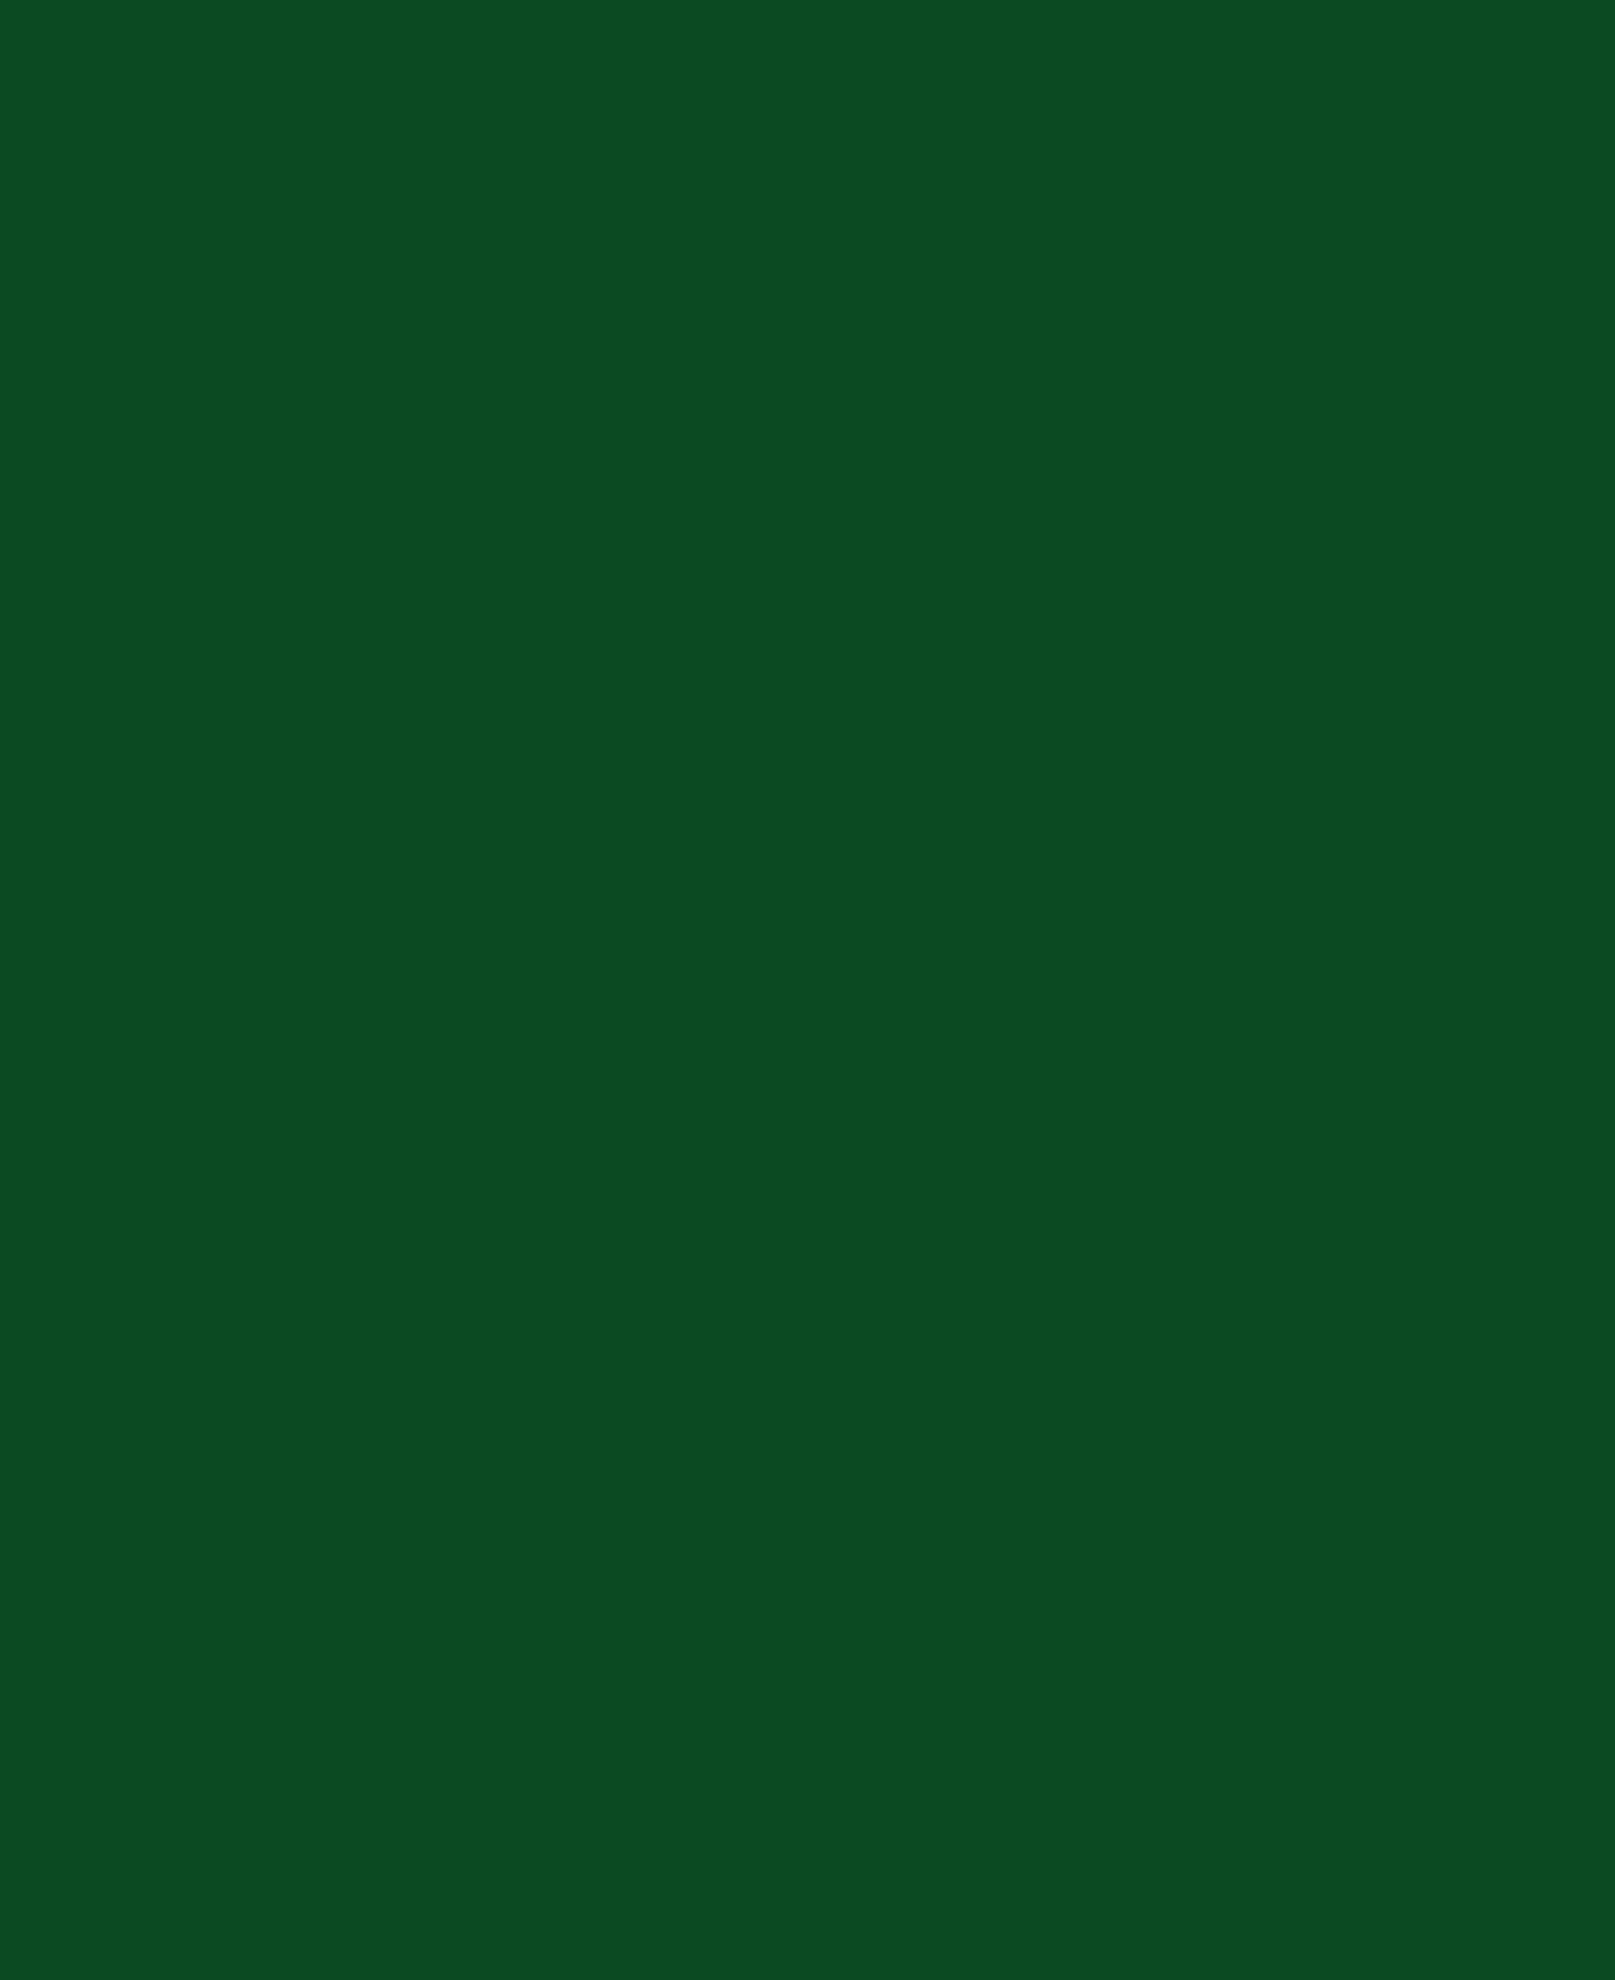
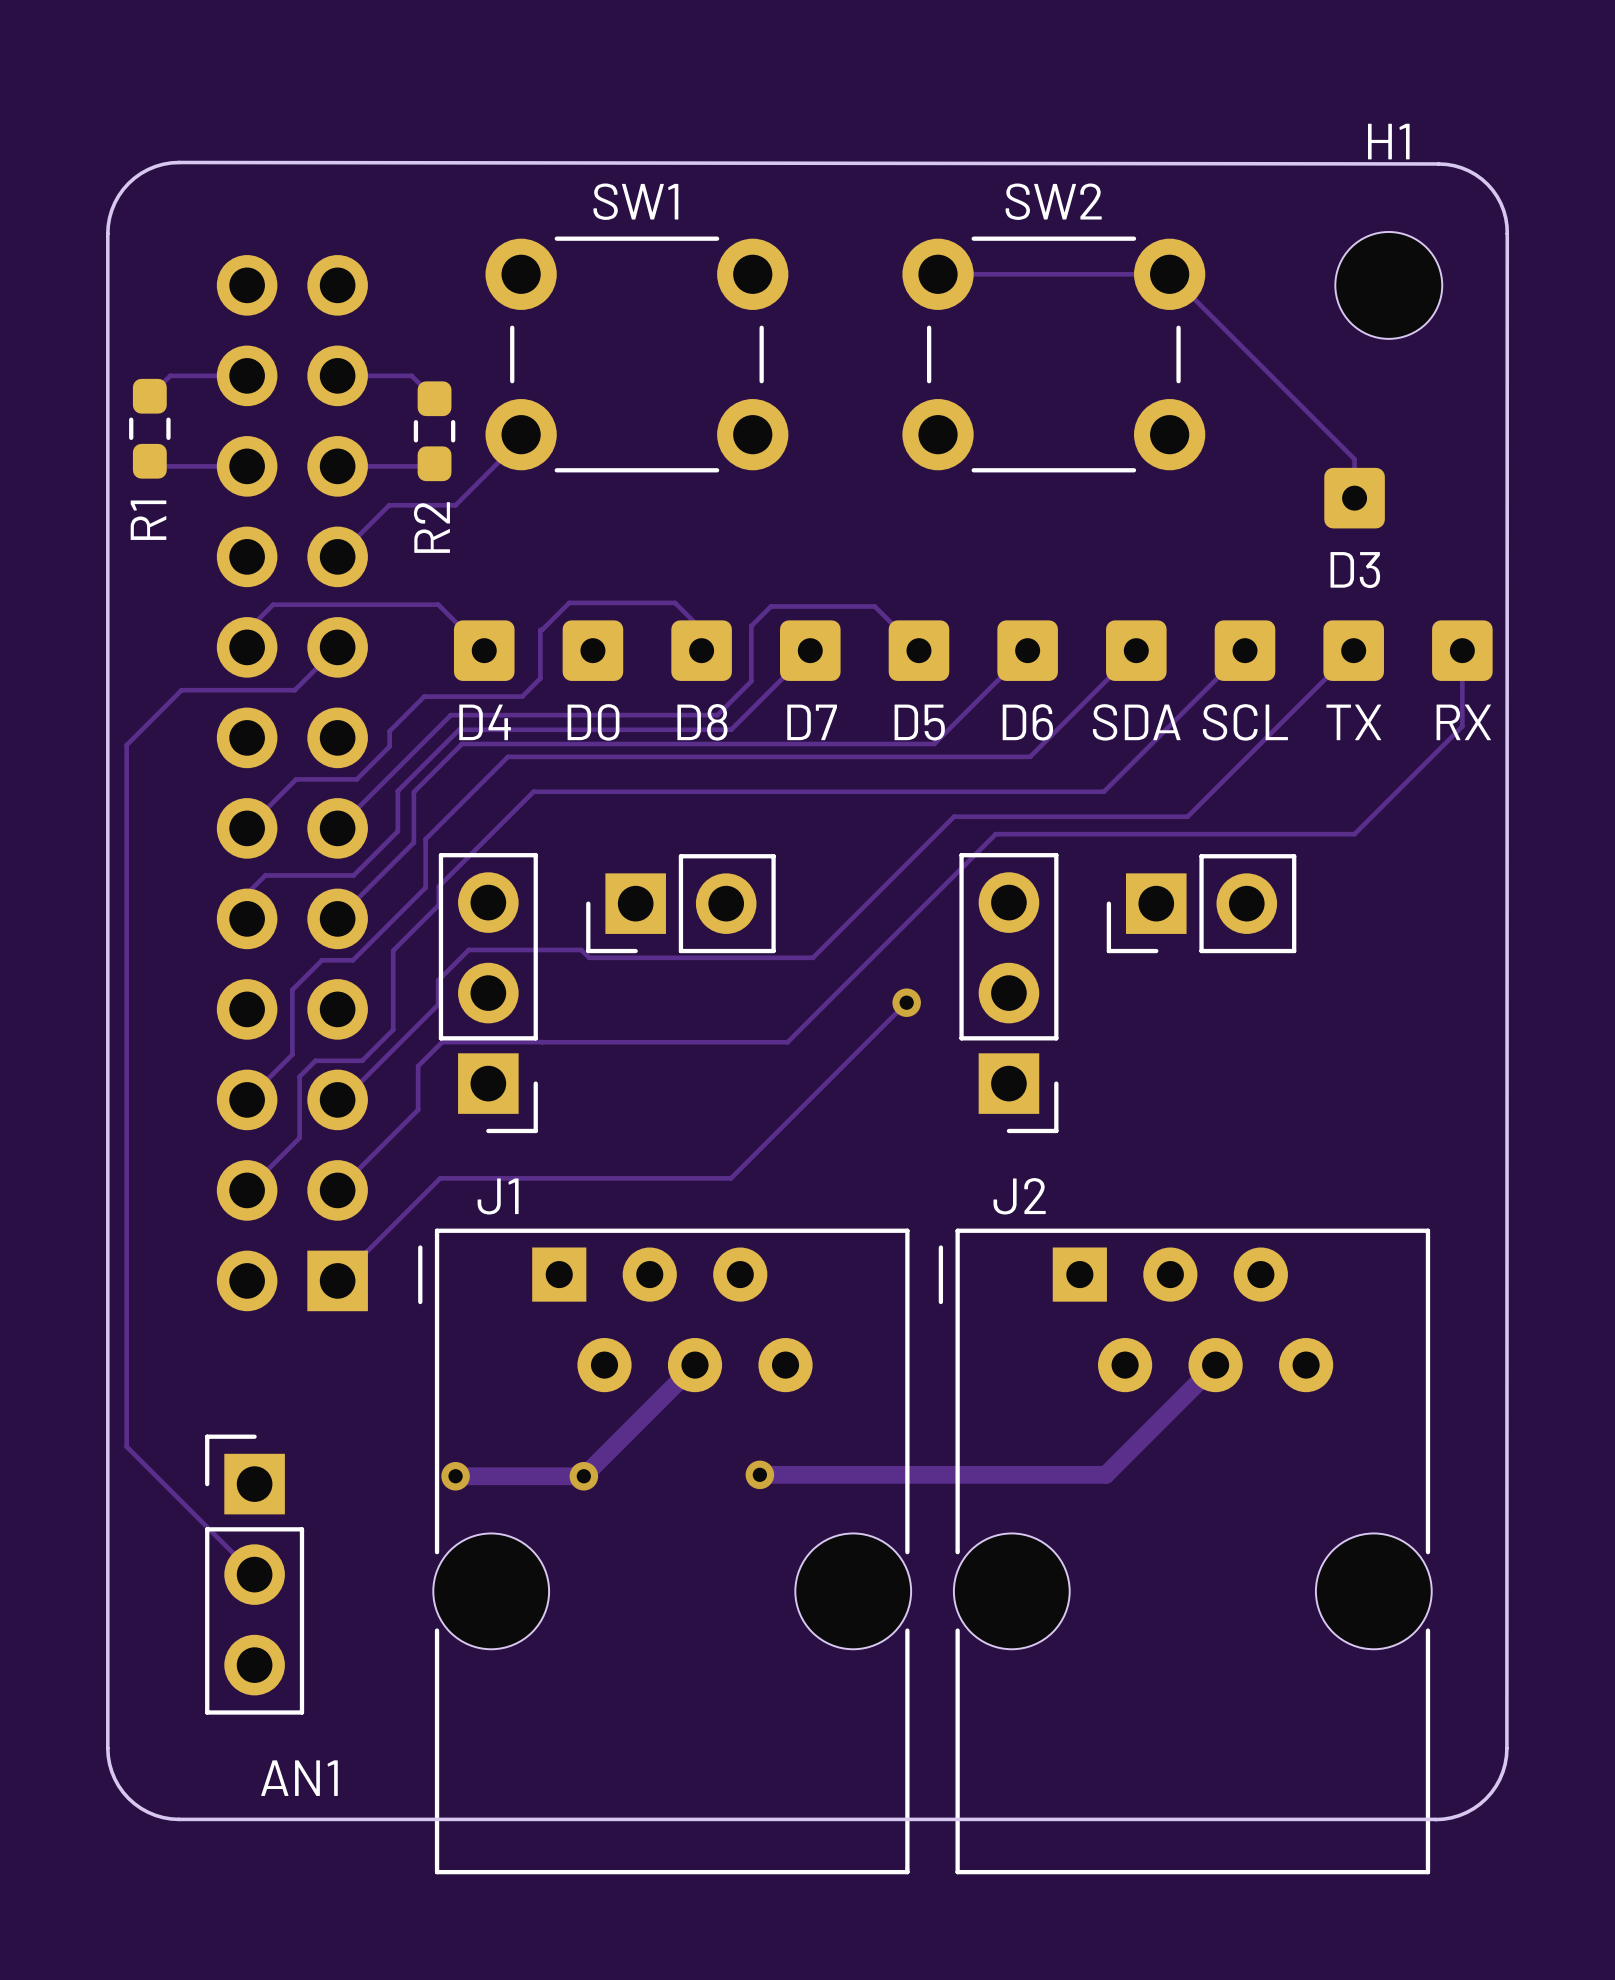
board edge: none -> (1507, 233) (1503, 210) (1497, 196) (1487, 184) (1468, 170) (1454, 165) (1438, 163) (179, 162) (163, 164) (148, 169) (128, 183) (114, 202) (109, 217) (107, 233) (107, 1748) (111, 1771) (123, 1792) (134, 1803) (148, 1812) (163, 1817) (179, 1819) (1435, 1819)
board edge: none -> (1507, 233) (1506, 1748)
track: none -> (938, 274) (1169, 274) (1354, 459) (1354, 498)
H1: none -> (1388, 285)
SW1: none -> (636, 354)
SW2: none -> (1053, 354)
track: none -> (247, 375) (170, 375) (149, 396)
track: none -> (337, 375) (411, 375) (434, 398)
R1: none -> (149, 428)
R2: none -> (434, 431)
track: none -> (521, 434) (521, 439) (455, 505) (389, 505) (337, 556)
track: none -> (149, 461) (154, 466) (247, 466)
track: none -> (434, 463) (431, 466) (337, 466)
part: none -> D3 (1354, 498)
track: none -> (247, 647) (247, 630) (273, 604) (438, 604) (484, 650)
track: none -> (337, 647) (294, 690) (181, 690) (126, 745) (126, 1446) (254, 1574)
part: none -> D4 (484, 650)
part: none -> D0 (592, 650)
track: none -> (701, 650) (701, 629) (675, 602) (569, 602) (540, 629) (540, 678) (522, 696) (424, 696) (389, 731) (389, 746) (356, 779) (296, 779) (247, 828)
part: none -> D8 (701, 650)
track: none -> (810, 650) (731, 729) (459, 729) (397, 791) (397, 831) (353, 875) (265, 875) (247, 893) (247, 918)
part: none -> D7 (810, 650)
track: none -> (918, 650) (874, 606) (770, 606) (751, 626) (751, 681) (717, 715) (450, 715) (337, 828)
part: none -> D5 (918, 650)
track: none -> (1027, 650) (934, 744) (461, 744) (413, 792) (413, 842) (337, 918)
part: none -> D6 (1027, 650)
track: none -> (1136, 650) (1030, 756) (507, 756) (425, 839) (425, 887) (352, 960) (321, 960) (292, 989) (292, 1054) (247, 1099)
part: none -> SDA (1136, 650)
track: none -> (1245, 650) (1103, 791) (533, 791) (438, 886) (438, 905) (393, 950) (393, 1029) (362, 1060) (315, 1060) (299, 1076) (299, 1137) (247, 1190)
part: none -> SCL (1245, 650)
track: none -> (1353, 650) (1187, 816) (954, 816) (812, 957) (589, 957) (581, 949) (468, 949) (438, 980) (438, 1004) (343, 1099) (337, 1099)
part: none -> TX (1353, 650)
track: none -> (1462, 650) (1462, 726) (1354, 834) (995, 834) (787, 1042) (542, 1042)
part: none -> RX (1462, 650)
part: none -> (292, 783)
part: none -> (680, 903)
part: none -> (1201, 903)
part: none -> (488, 993)
part: none -> (1008, 993)
track: none -> (906, 1002) (731, 1178) (440, 1178) (337, 1280)
via: none -> (906, 1002)
track: none -> (541, 1042) (442, 1042) (418, 1066) (418, 1109) (337, 1190)
track: none -> (695, 1365) (583, 1476) (455, 1476)
track: none -> (1215, 1365) (1105, 1474) (759, 1474)
via: none -> (759, 1474)
via: none -> (455, 1476)
via: none -> (583, 1476)
J1: none -> (664, 1551)
J2: none -> (1185, 1551)
AN1: none -> (254, 1574)
board edge: none -> (1506, 1748) (1505, 1764) (1499, 1779) (1486, 1798) (1473, 1808) (1459, 1815) (1435, 1819)

